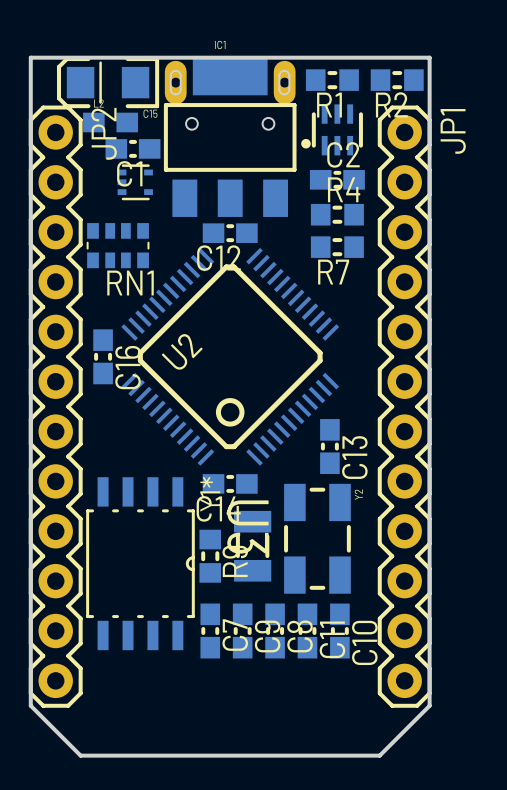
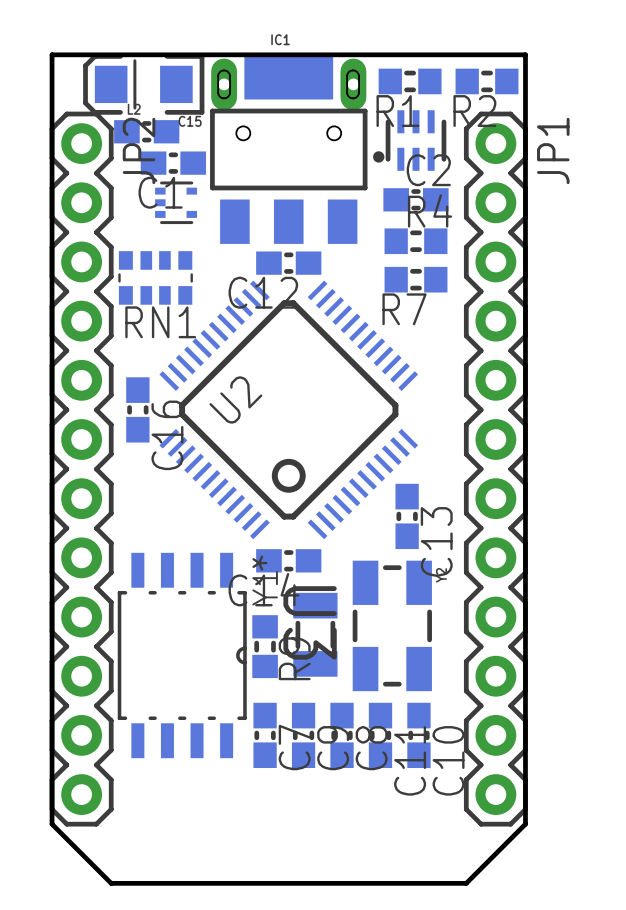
L2 footprint: [83, 112, 139, 133] -> [114, 120, 180, 144]

